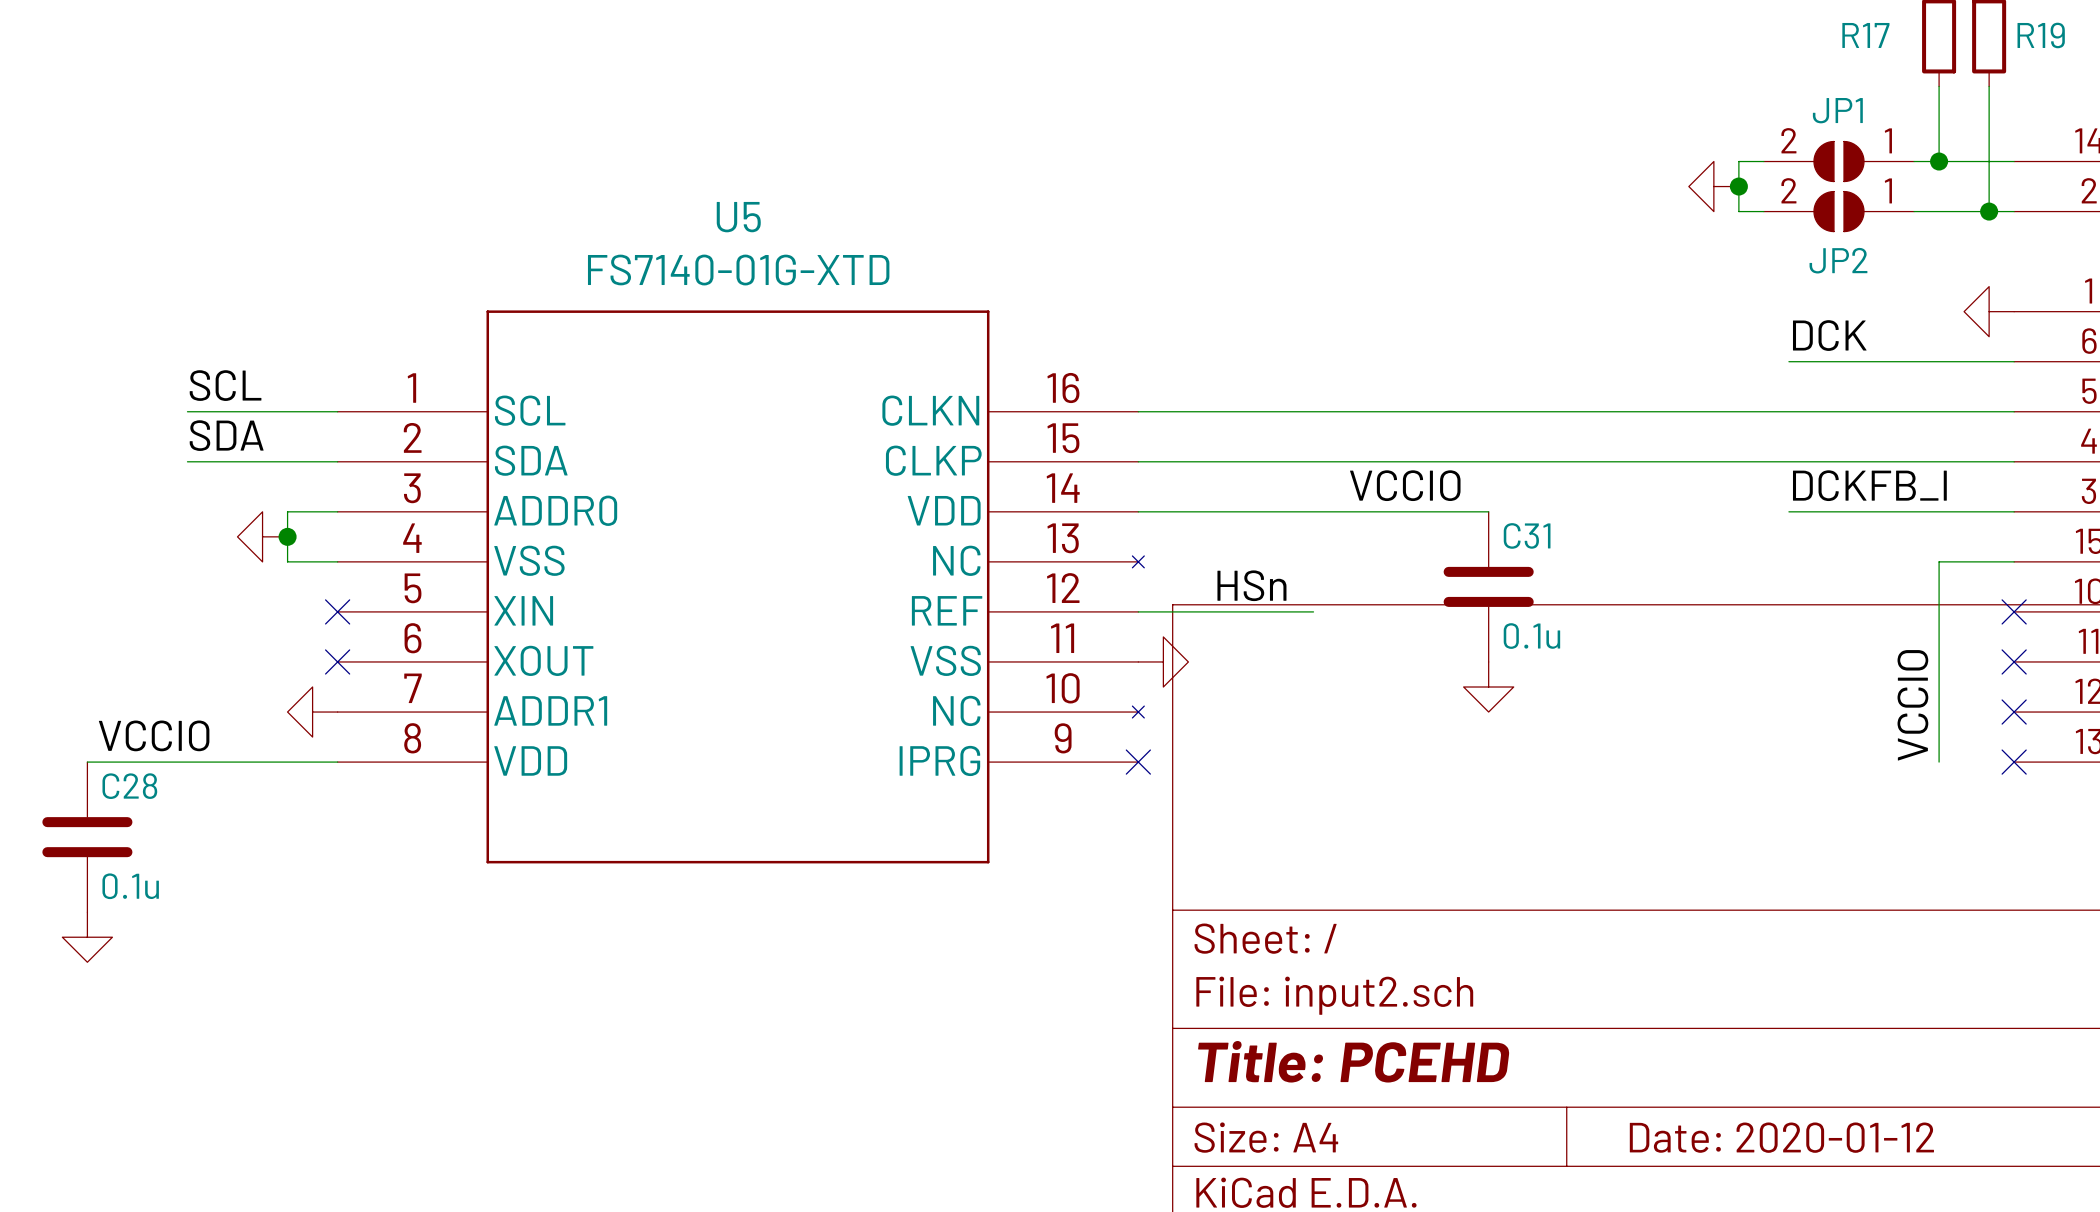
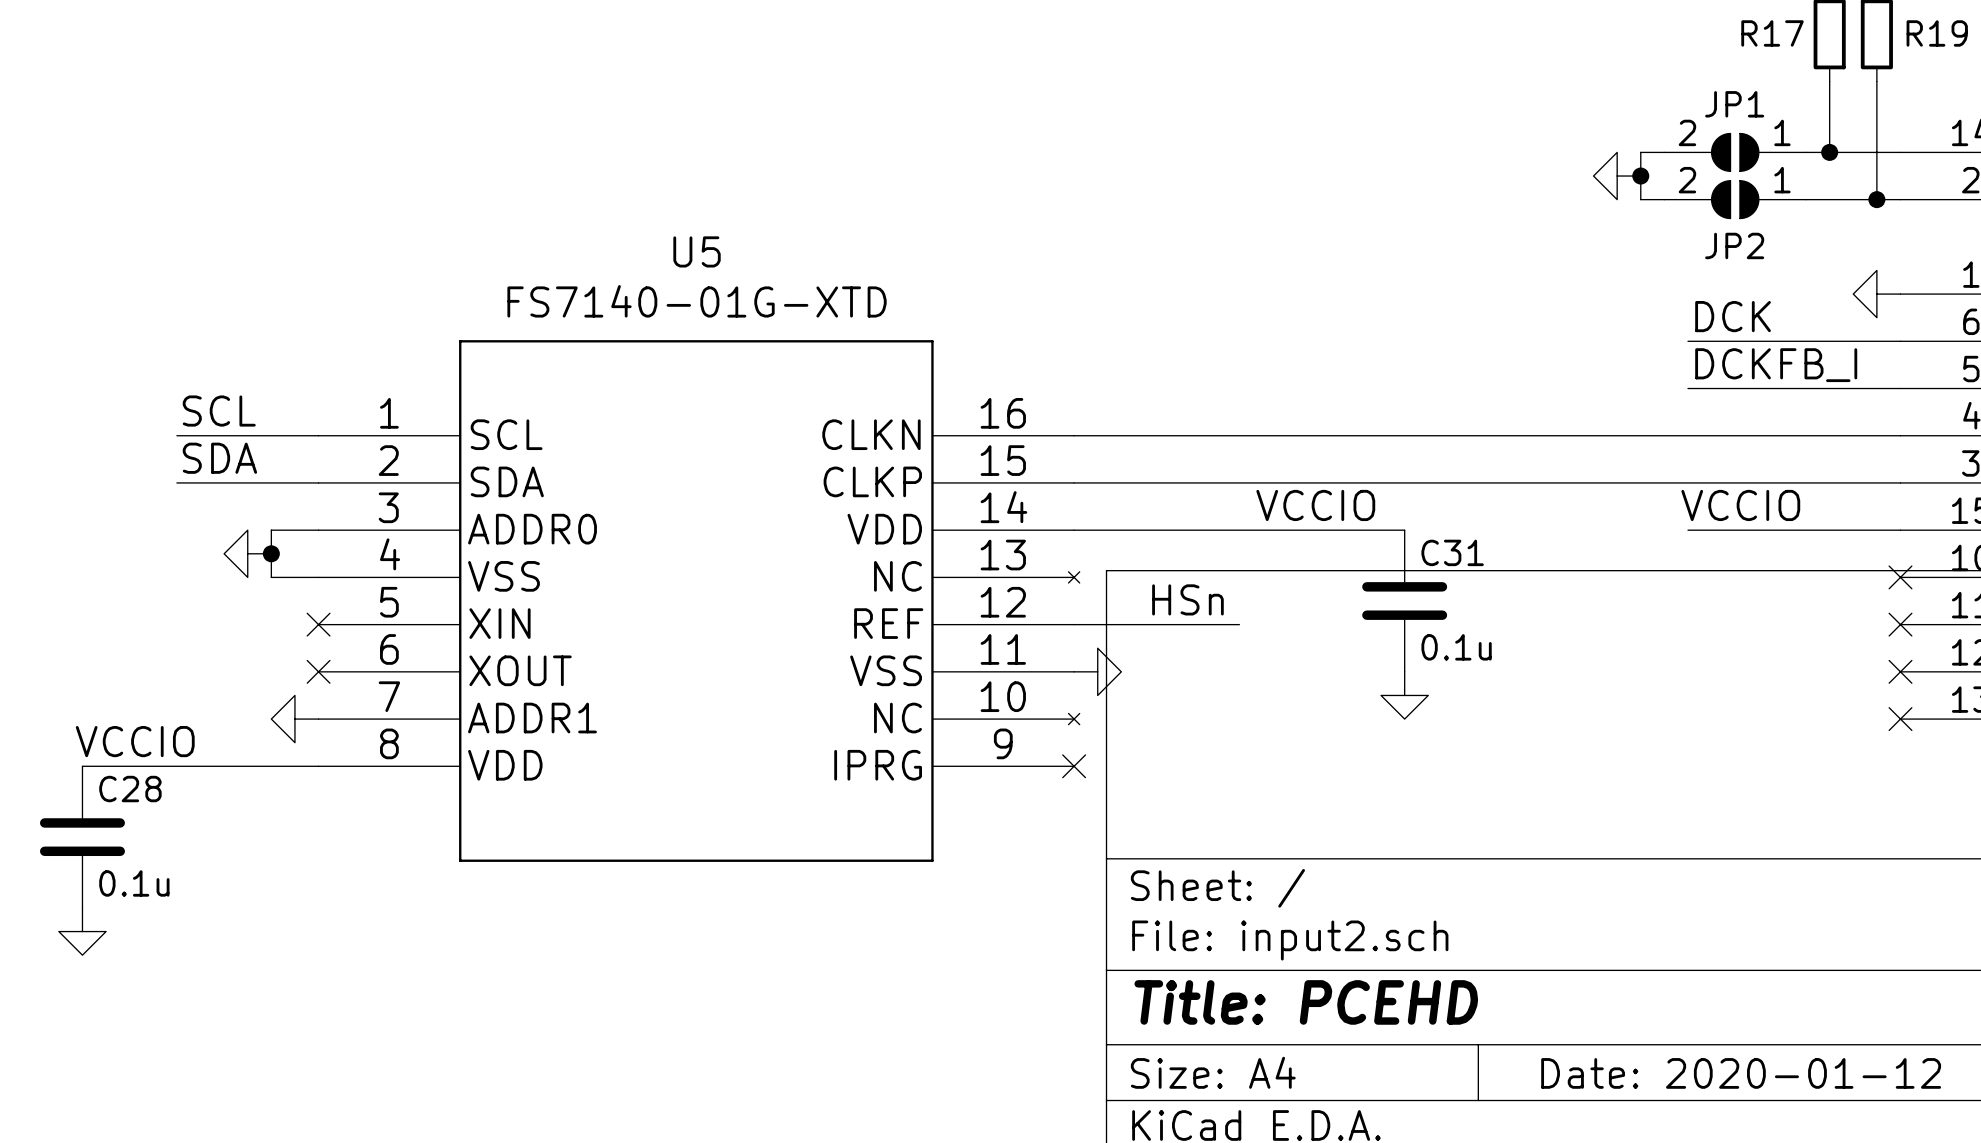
label: SCL (225, 385) -> none
wire: (187, 411) (337, 411) -> none
wire: (1138, 411) (1788, 411) -> none
label: SDA (226, 435) -> SCL (219, 411)
label: none -> SDA (219, 458)
label position: VCCIO (1405, 485) -> VCCIO (1315, 505)
label position: DCKFB_I (1869, 485) -> DCKFB_I (1776, 365)
wire: none -> (176, 482) (271, 482)
wire: (287, 511) (287, 561) -> (318, 577) (271, 577) (271, 530)
wire: none -> (1404, 482) (1688, 482)
power symbol position: (262, 536) -> (247, 553)
junction position: (287, 536) -> (271, 553)
wire: none -> (1074, 530) (1404, 530)
wire: (1939, 561) (1939, 762) -> (1829, 530) (1688, 530)
label position: HSn (1251, 585) -> HSn (1187, 599)
U5 position: (740, 586) -> (699, 601)
C31 position: (1488, 586) -> (1404, 601)
no-connect mark position: (337, 611) -> (318, 671)
wire: (1138, 611) (1313, 611) -> (1074, 624) (1239, 624)
power symbol position: (1163, 661) -> (1097, 671)
power symbol position: (1488, 687) -> (1404, 695)
label rotation: 0° (1912, 705) -> 90° clockwise (1740, 505)
power symbol position: (312, 712) -> (294, 719)
label position: VCCIO (154, 735) -> VCCIO (135, 741)
wire: (87, 762) (337, 762) -> (82, 766) (318, 766)
no-connect mark position: (1138, 762) -> (1074, 766)
C28 position: (87, 837) -> (82, 837)
power symbol position: (87, 937) -> (82, 931)

